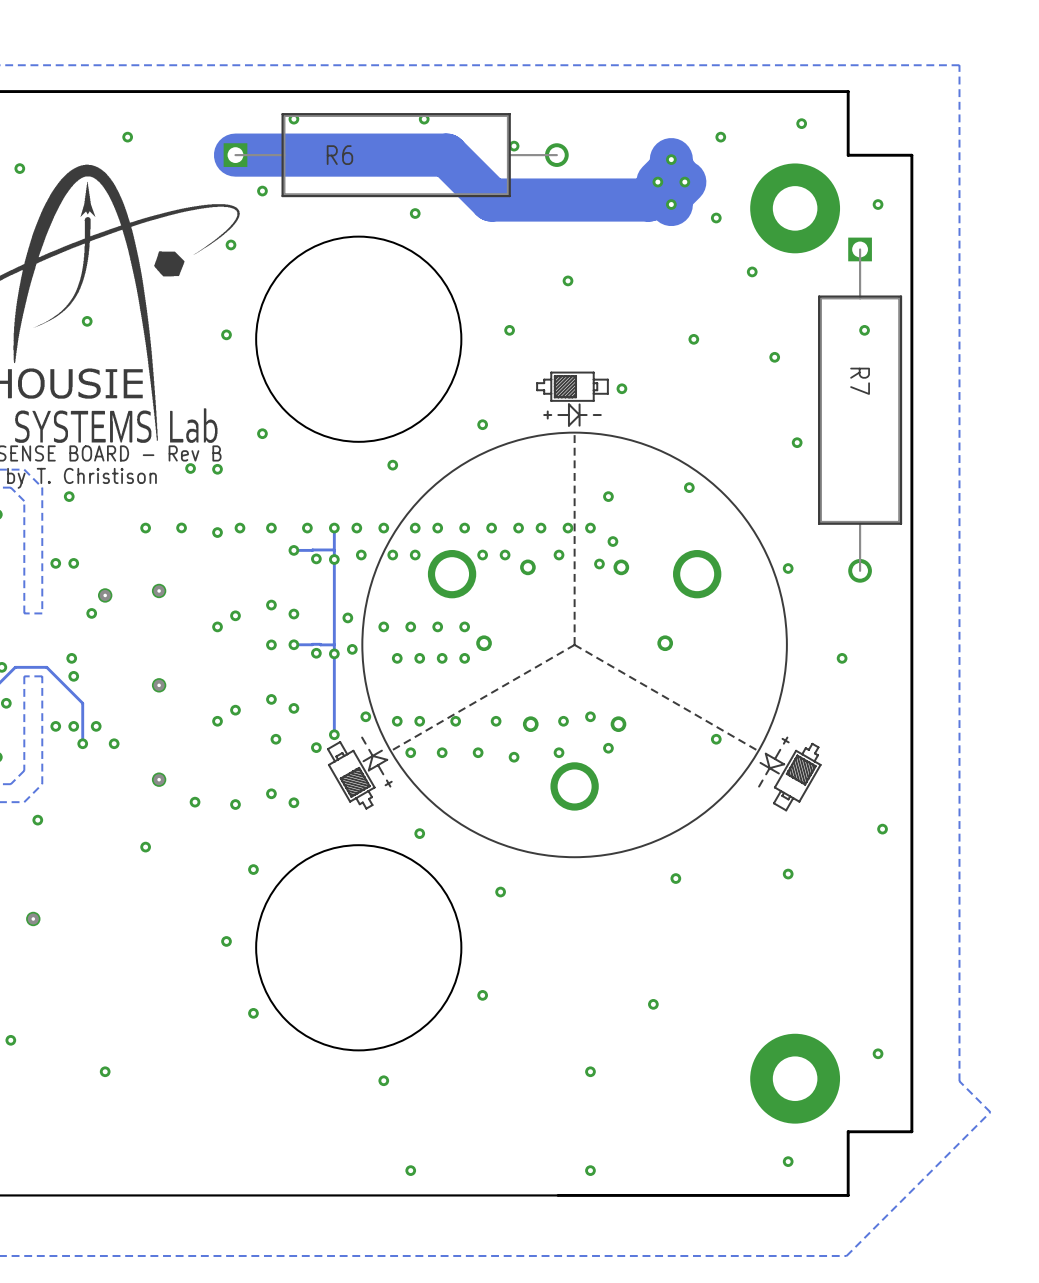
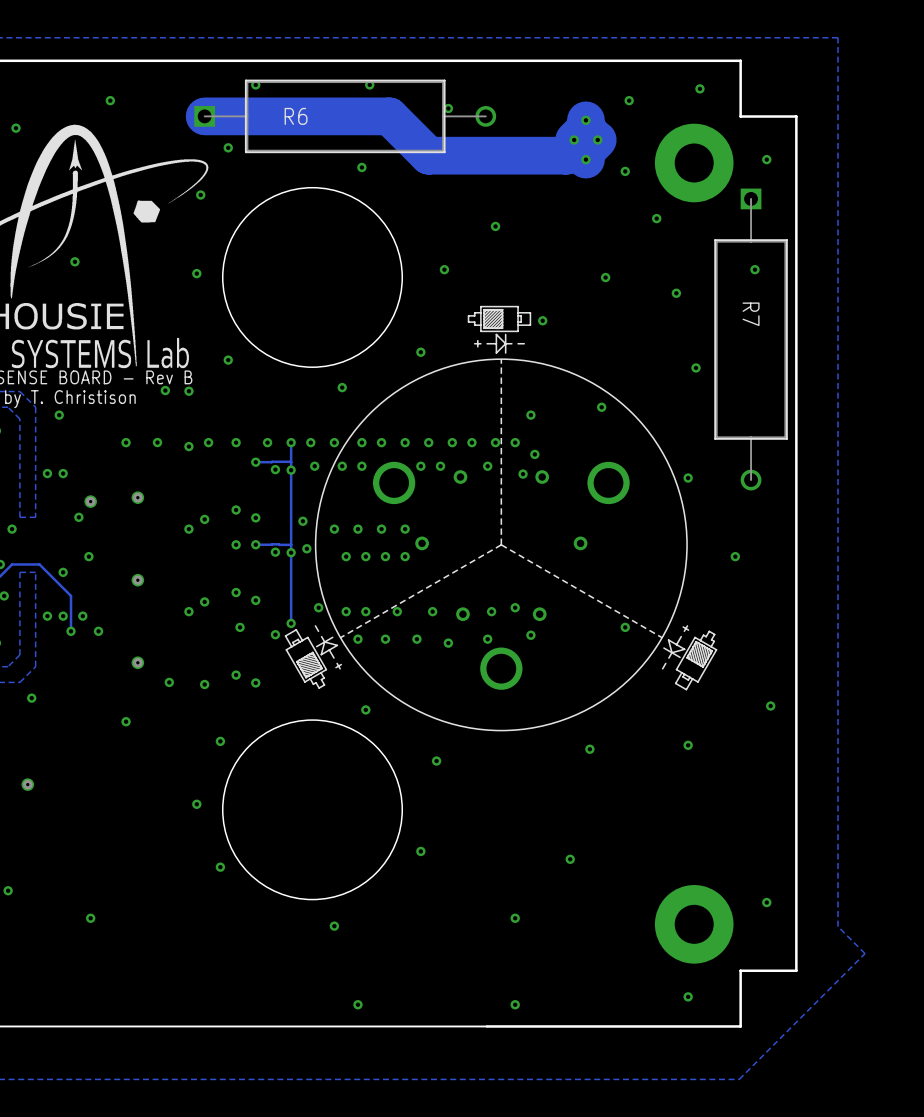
via: none -> (12, 529)
via position: (71, 658) -> (88, 556)

